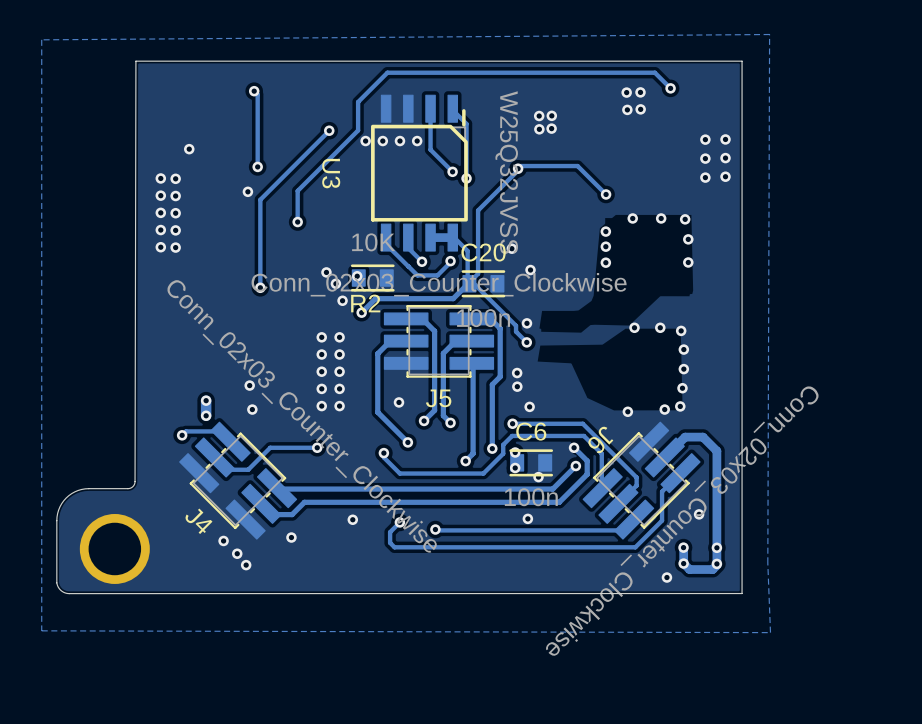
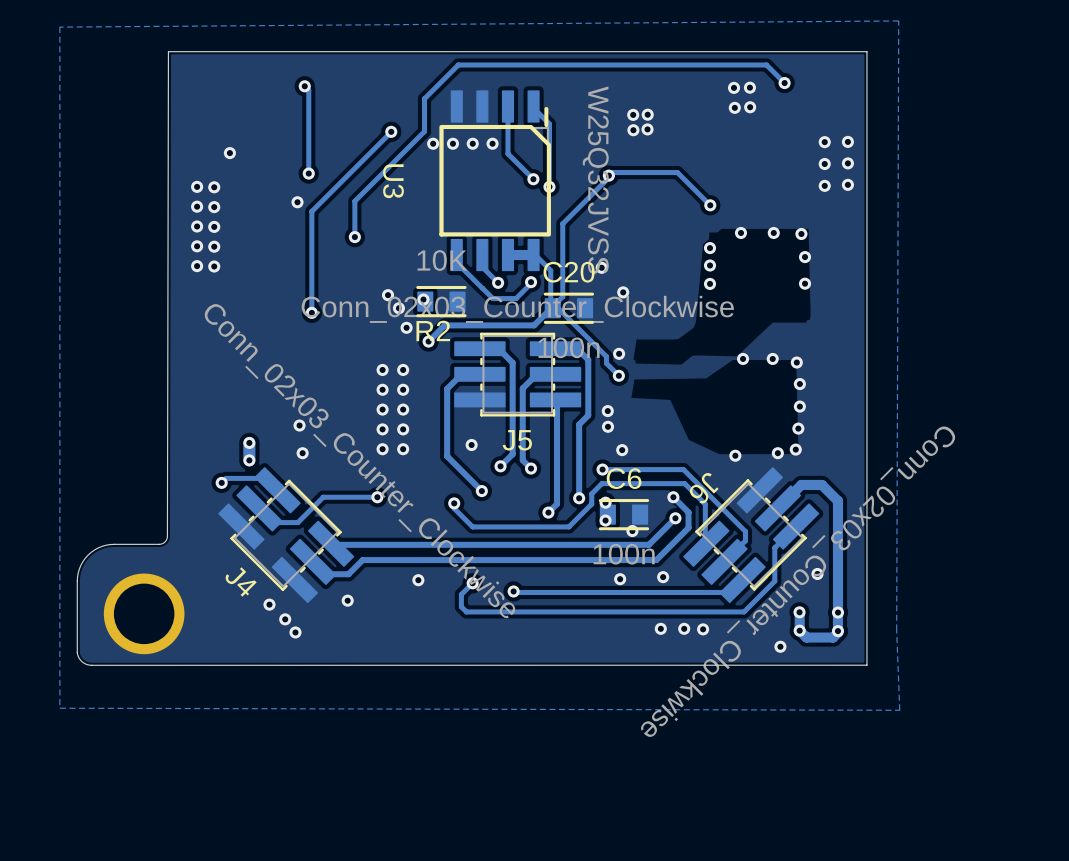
via: none -> (663, 577)
via: none -> (660, 628)
via: none -> (684, 628)
via: none -> (703, 629)

